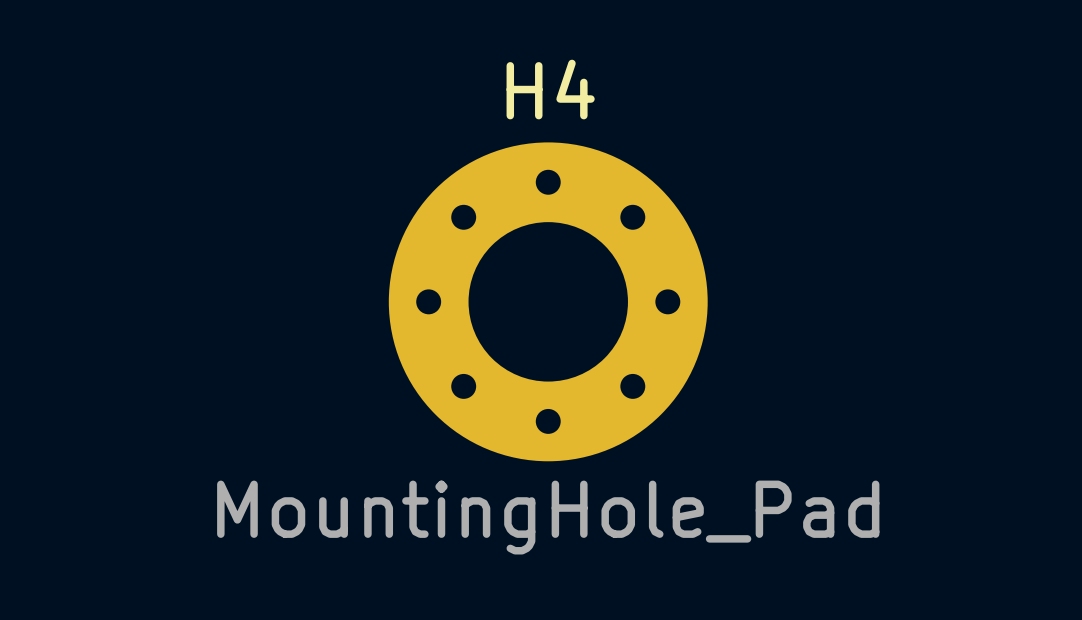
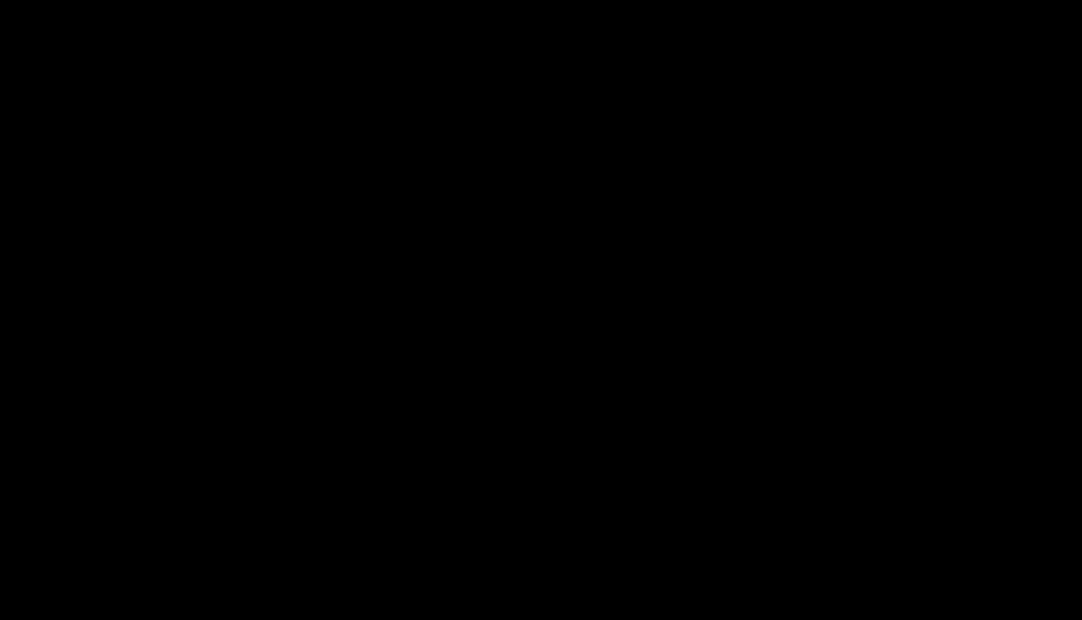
H4: MountingHole_Pad (548, 301) -> none

